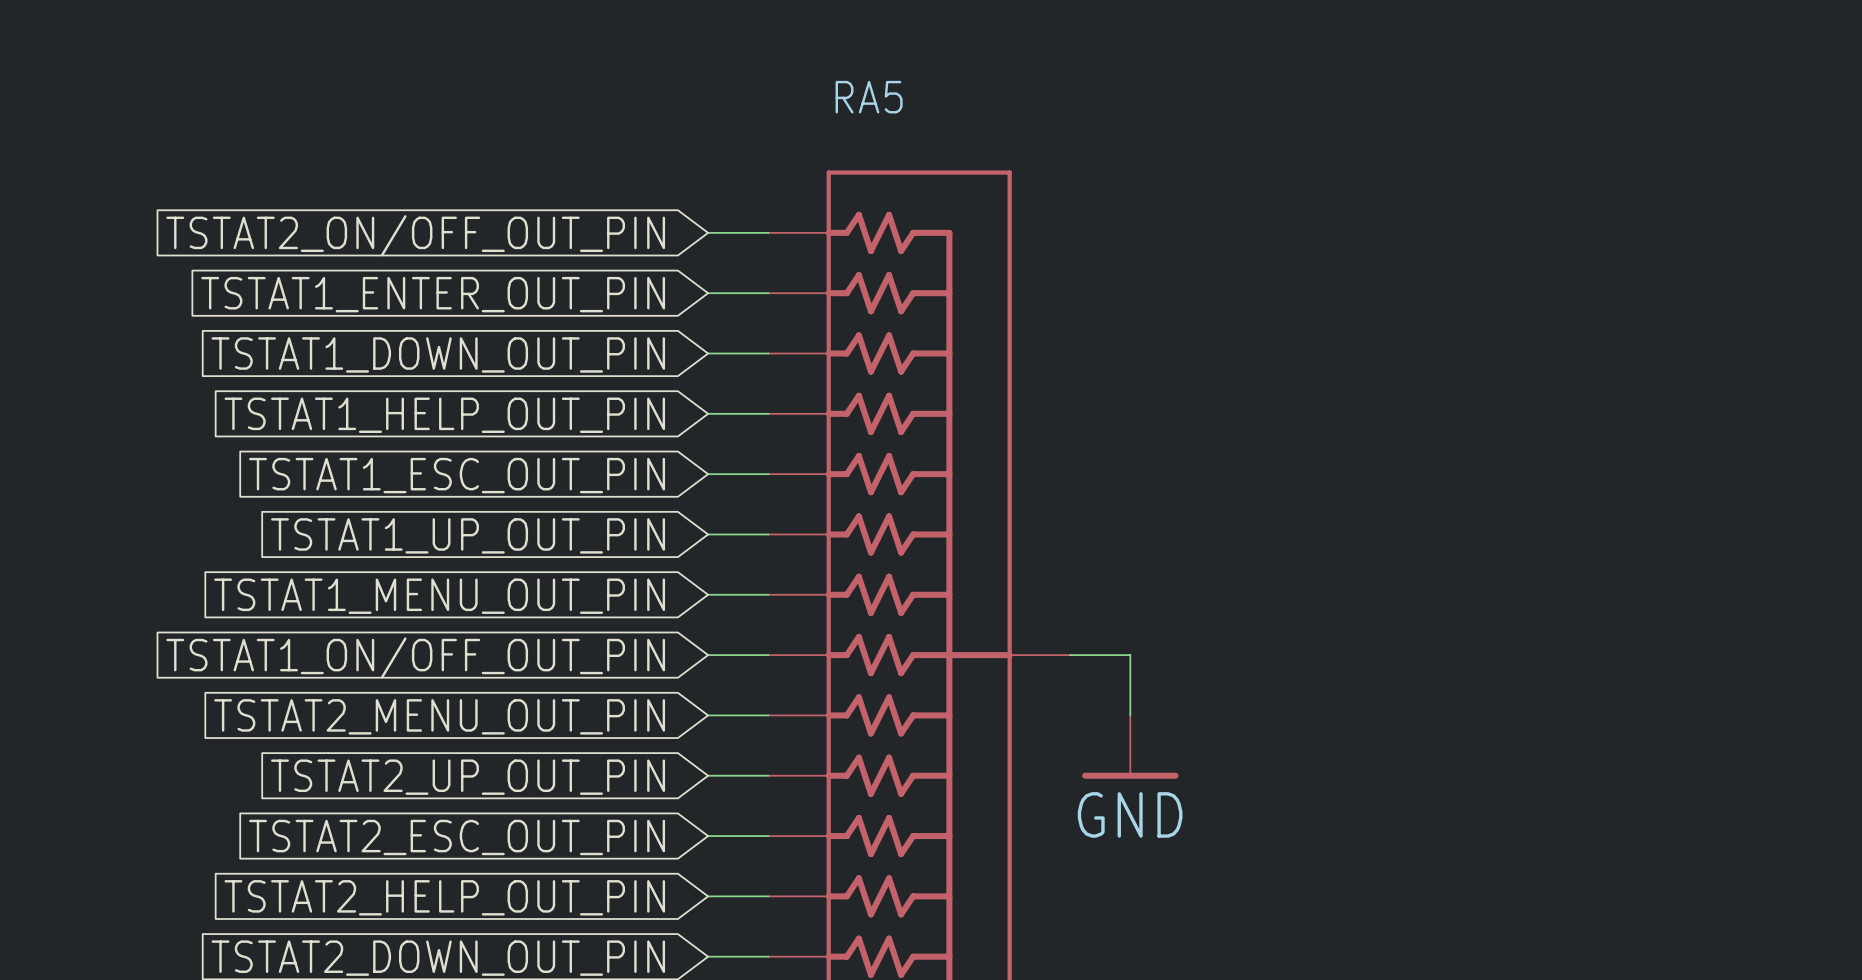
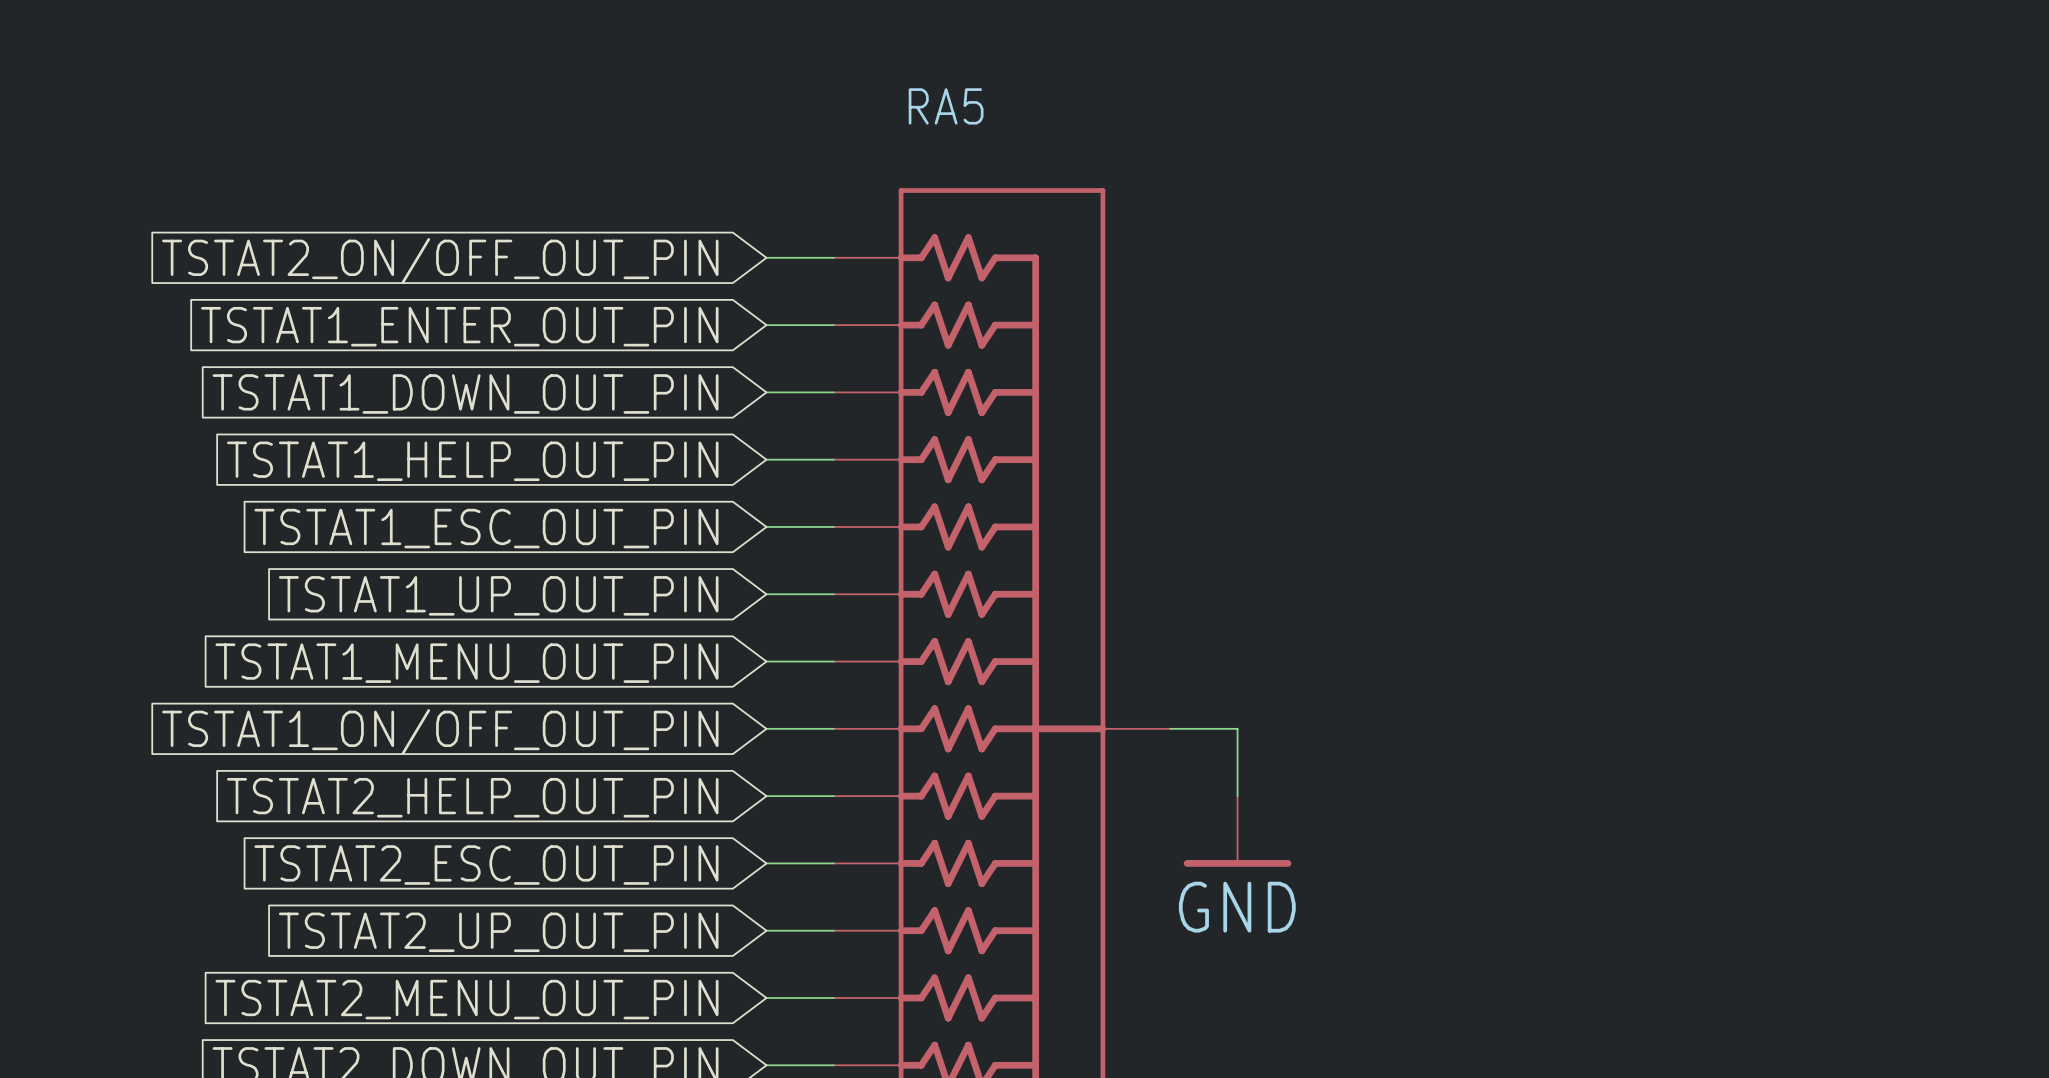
global label: TSTAT2_MENU_OUT_PIN (439, 716) -> TSTAT2_HELP_OUT_PIN (472, 797)
global label: TSTAT2_UP_OUT_PIN (468, 777) -> TSTAT2_ESC_OUT_PIN (486, 865)
global label: TSTAT2_ESC_OUT_PIN (457, 837) -> TSTAT2_UP_OUT_PIN (498, 932)
global label: TSTAT2_HELP_OUT_PIN (444, 897) -> TSTAT2_MENU_OUT_PIN (466, 999)

